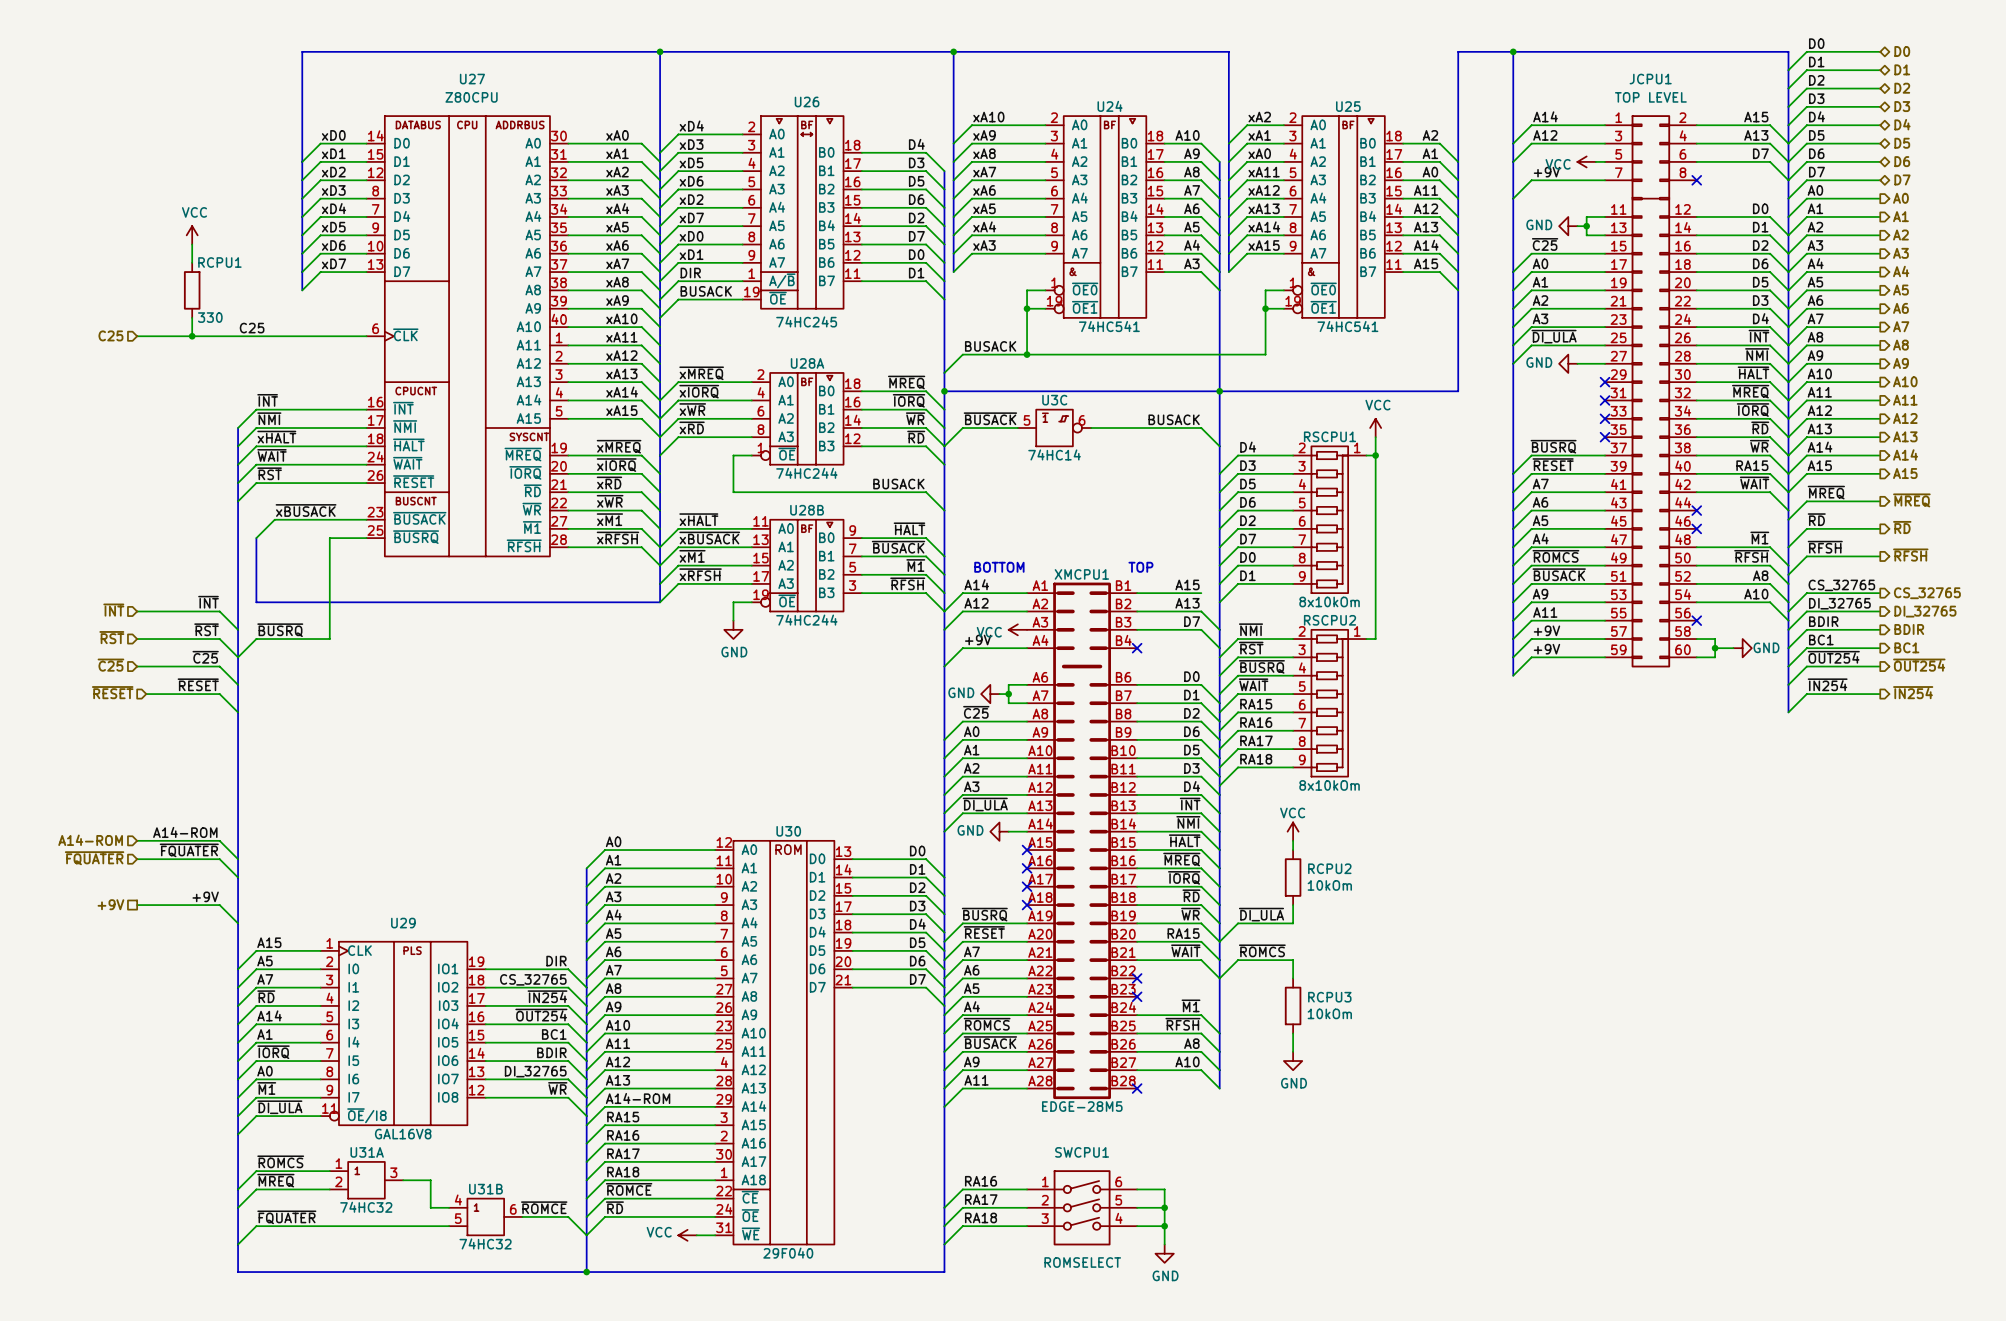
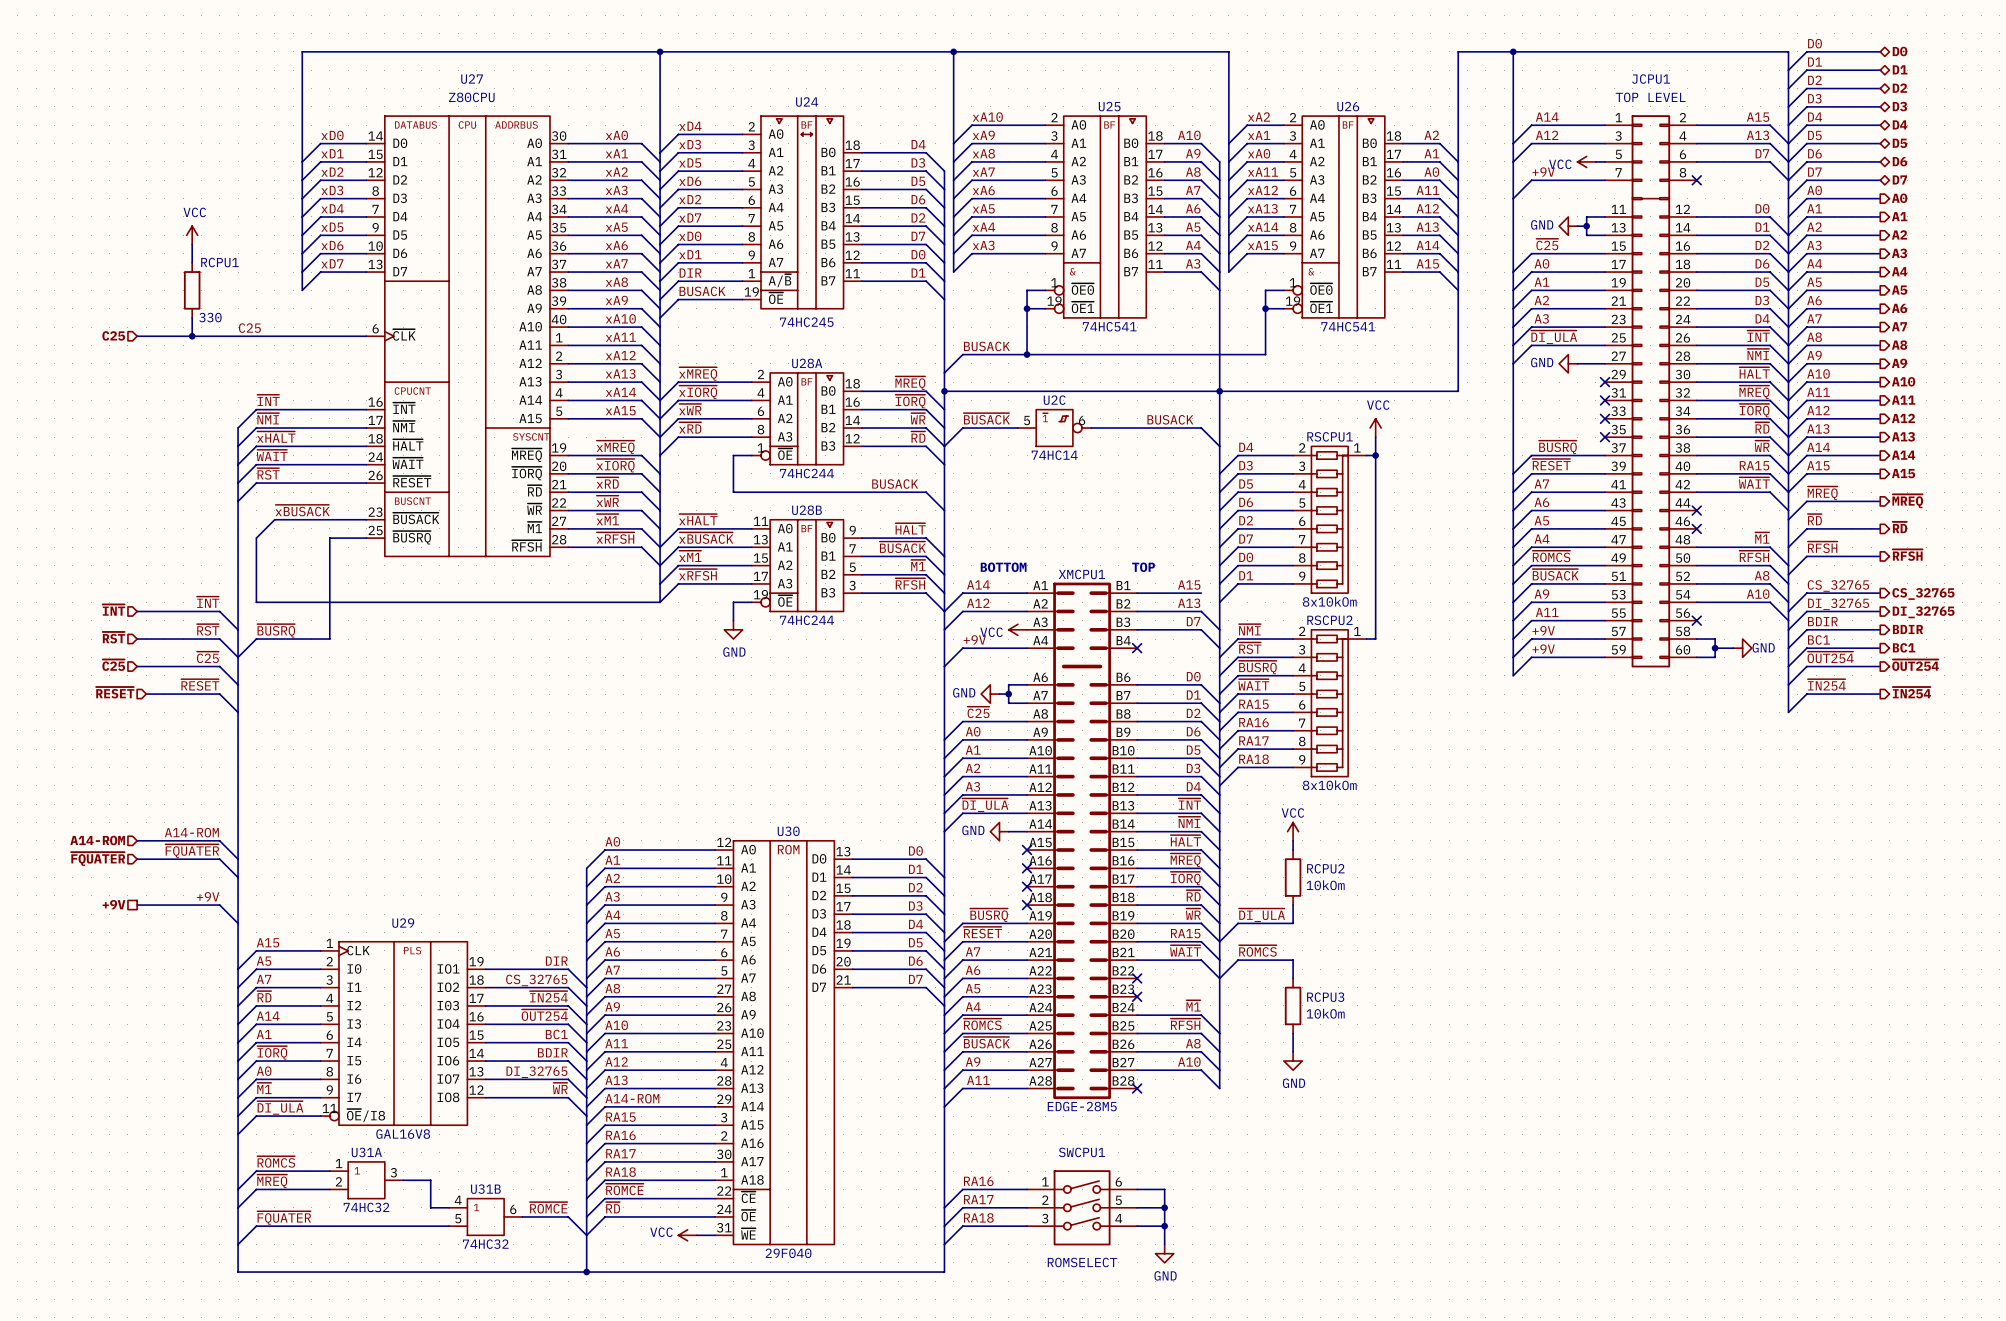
U26 name: U26 (807, 101) -> U24 (807, 101)
U24 name: U24 (1110, 106) -> U25 (1109, 106)
U25 name: U25 (1348, 106) -> U26 (1348, 106)
U3C name: U3C (1054, 400) -> U2C (1054, 400)

